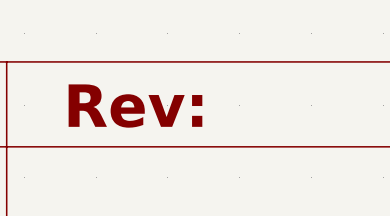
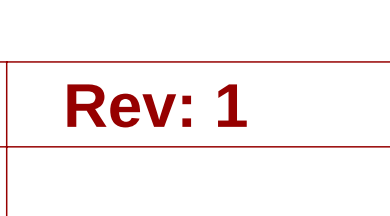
title block: Rev: (135, 106) -> Rev: 1 (157, 105)

